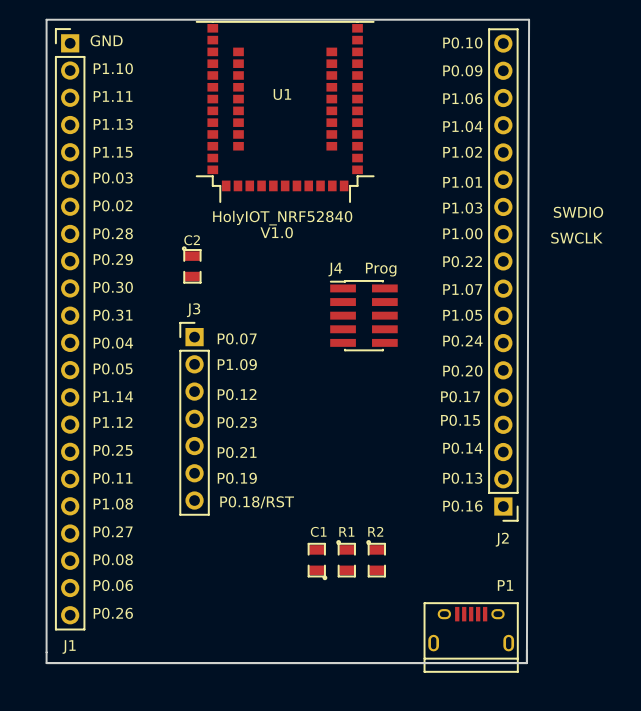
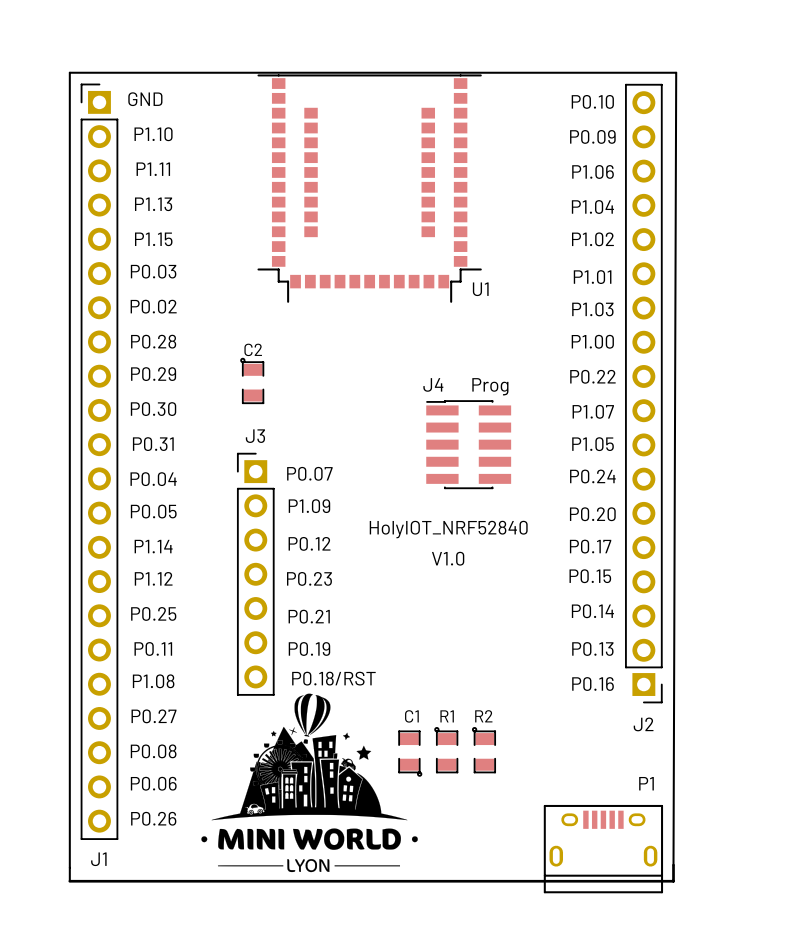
U1 name position: U1 (282, 94) -> U1 (480, 289)
text: SWDIO (578, 212) -> none
U1 value position: HolyIOT_NRF52840 (282, 218) -> HolyIOT_NRF52840 (448, 529)
text position: V1.0 (276, 232) -> V1.0 (448, 558)
text: SWCLK (576, 238) -> none
drawing: none -> [201, 693, 418, 873]

